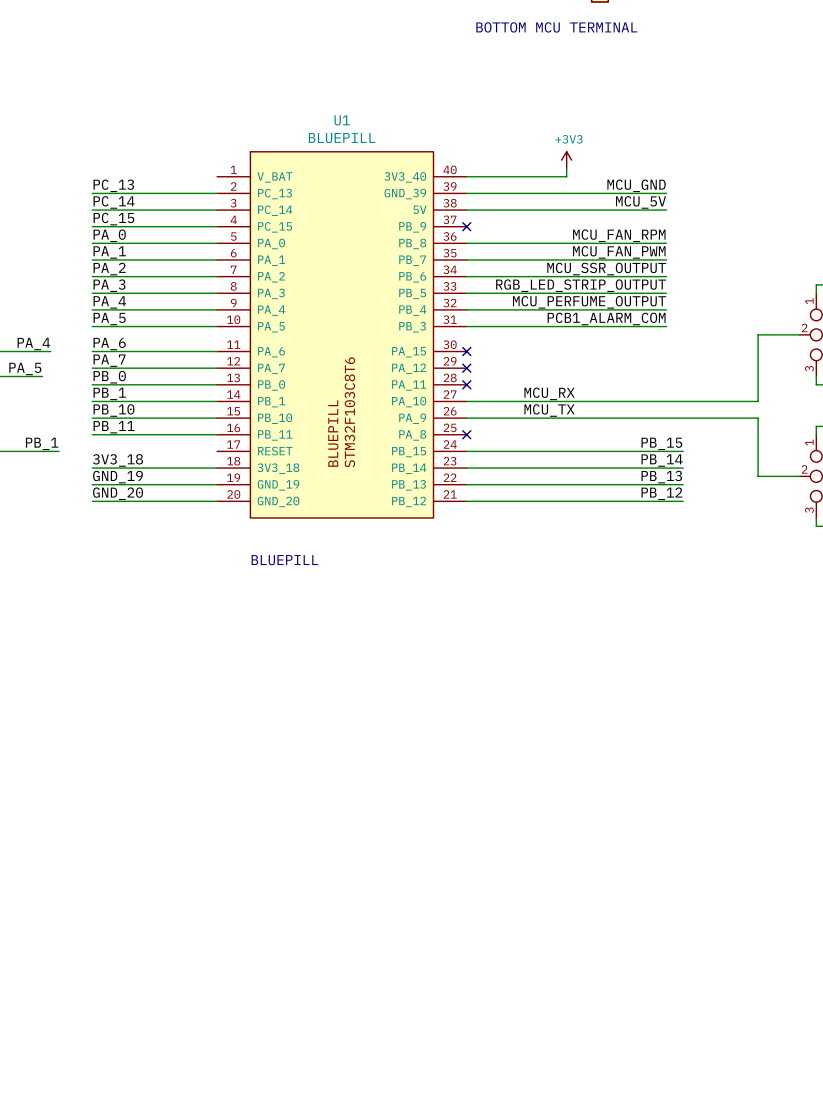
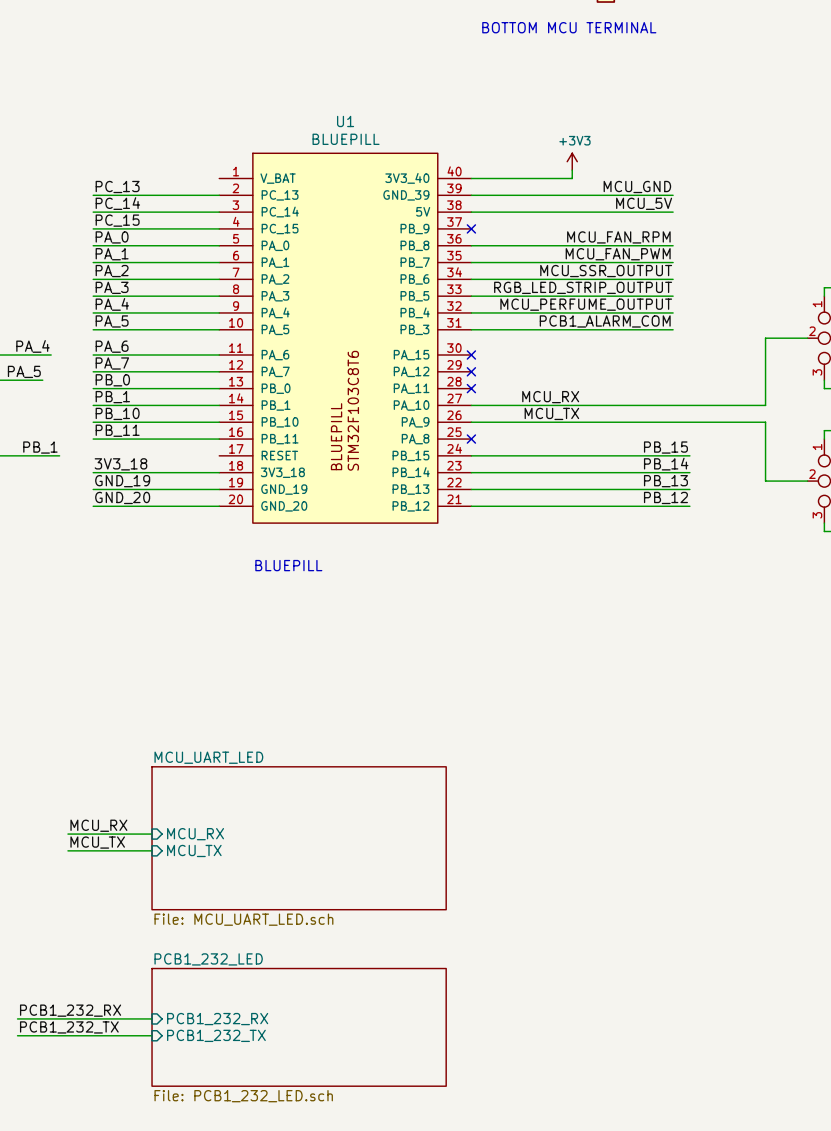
label: none -> MCU_RX (98, 825)
wire: none -> (67, 834) (152, 834)
sheet pin: none -> MCU_RX (195, 834)
sheet MCU_UART_LED: none -> File: MCU_UART_LED.sch (299, 838)
label: none -> MCU_TX (97, 842)
wire: none -> (67, 850) (152, 850)
sheet pin: none -> MCU_TX (194, 850)
label: none -> PCB1_232_RX (70, 1010)
wire: none -> (17, 1018) (152, 1018)
sheet pin: none -> PCB1_232_RX (217, 1019)
sheet PCB1_232_LED: none -> File: PCB1_232_LED.sch (299, 1027)
label: none -> PCB1_232_TX (69, 1027)
wire: none -> (17, 1035) (152, 1035)
sheet pin: none -> PCB1_232_TX (216, 1035)

